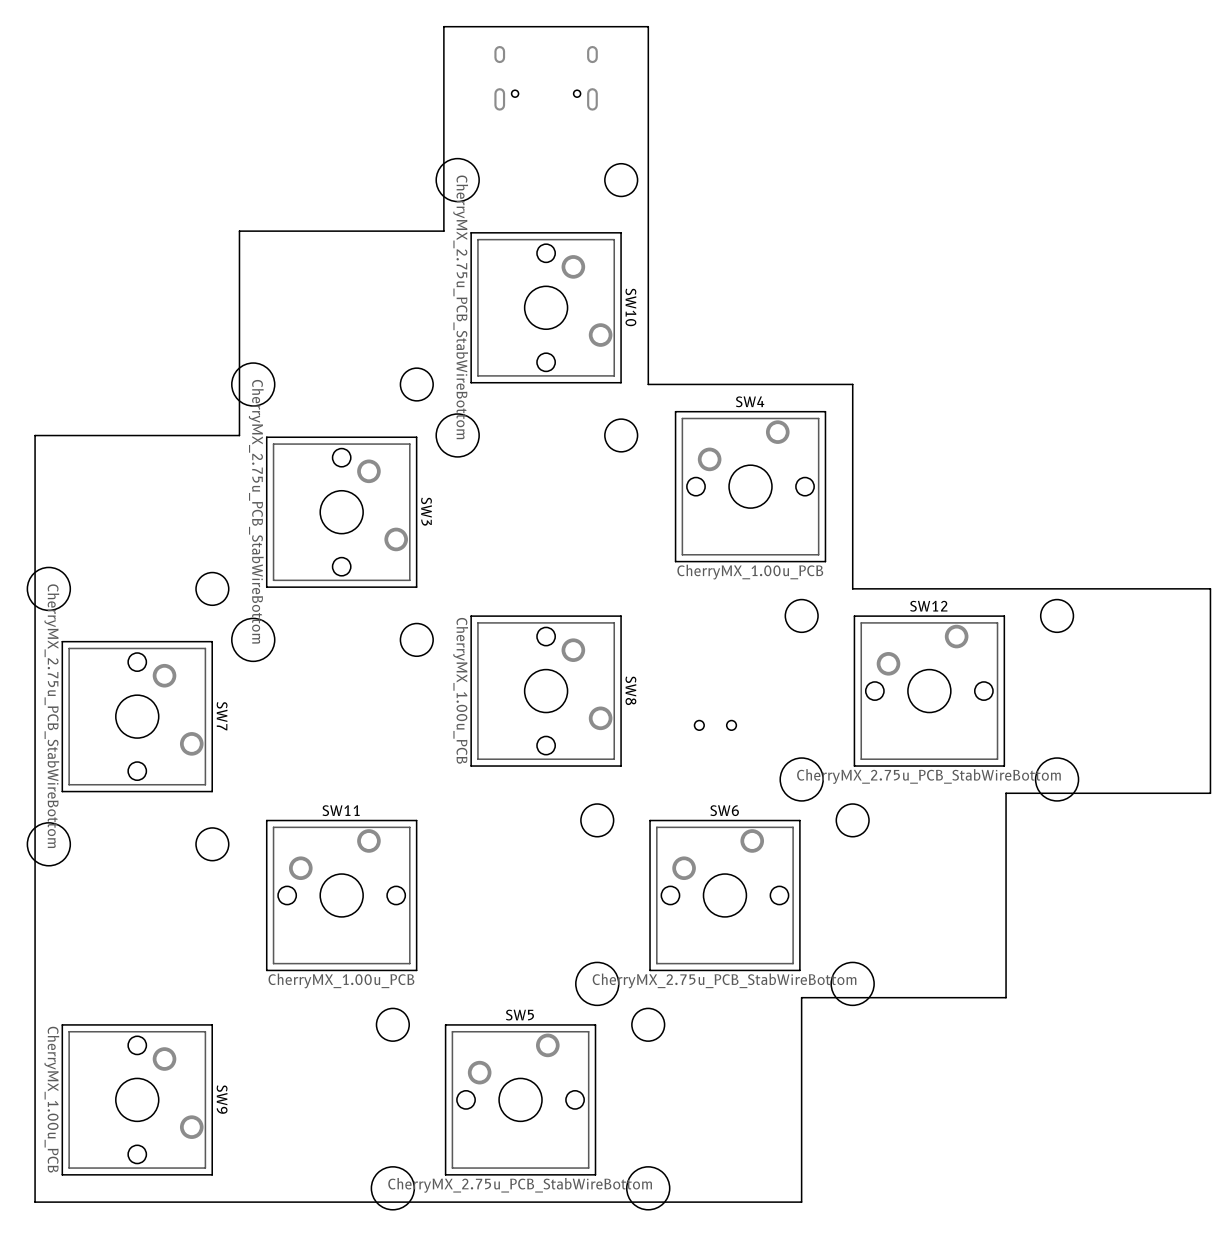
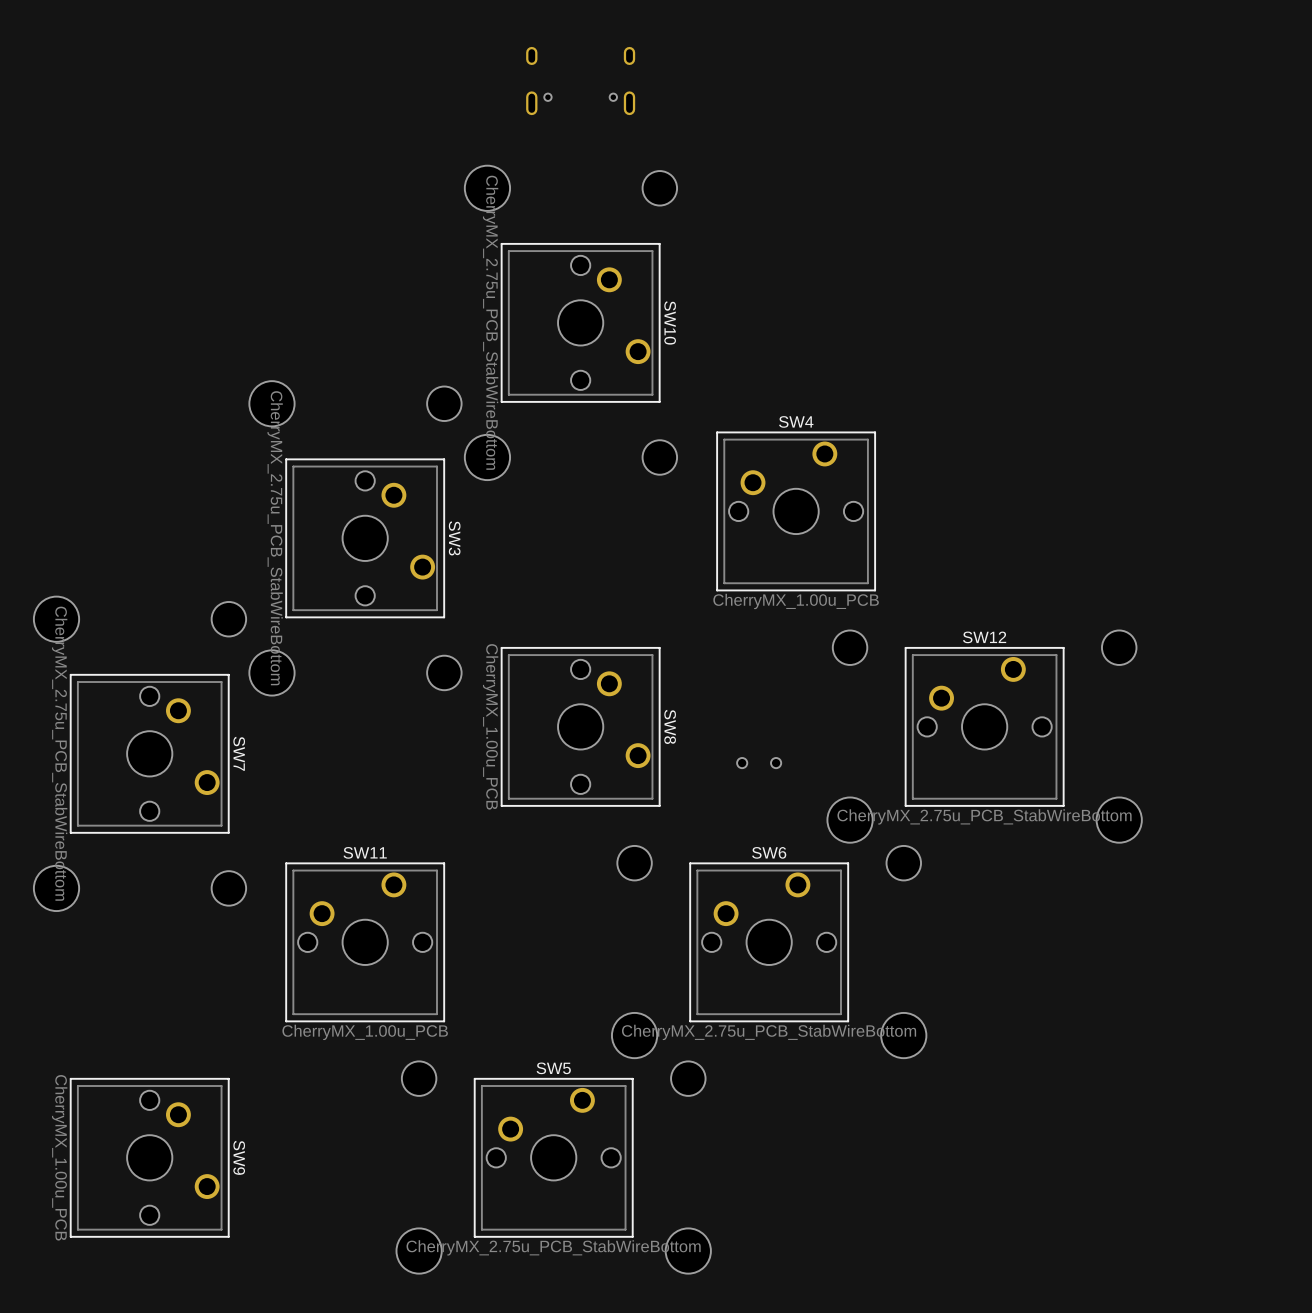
board edge: (648, 26) (443, 26) (443, 231) (239, 231) (239, 435) (35, 435) (35, 1202) (801, 1202) (801, 997) (1006, 997) (1006, 793) (1210, 793) (1210, 588) (852, 588) (852, 384) (648, 384) (648, 26) -> none

